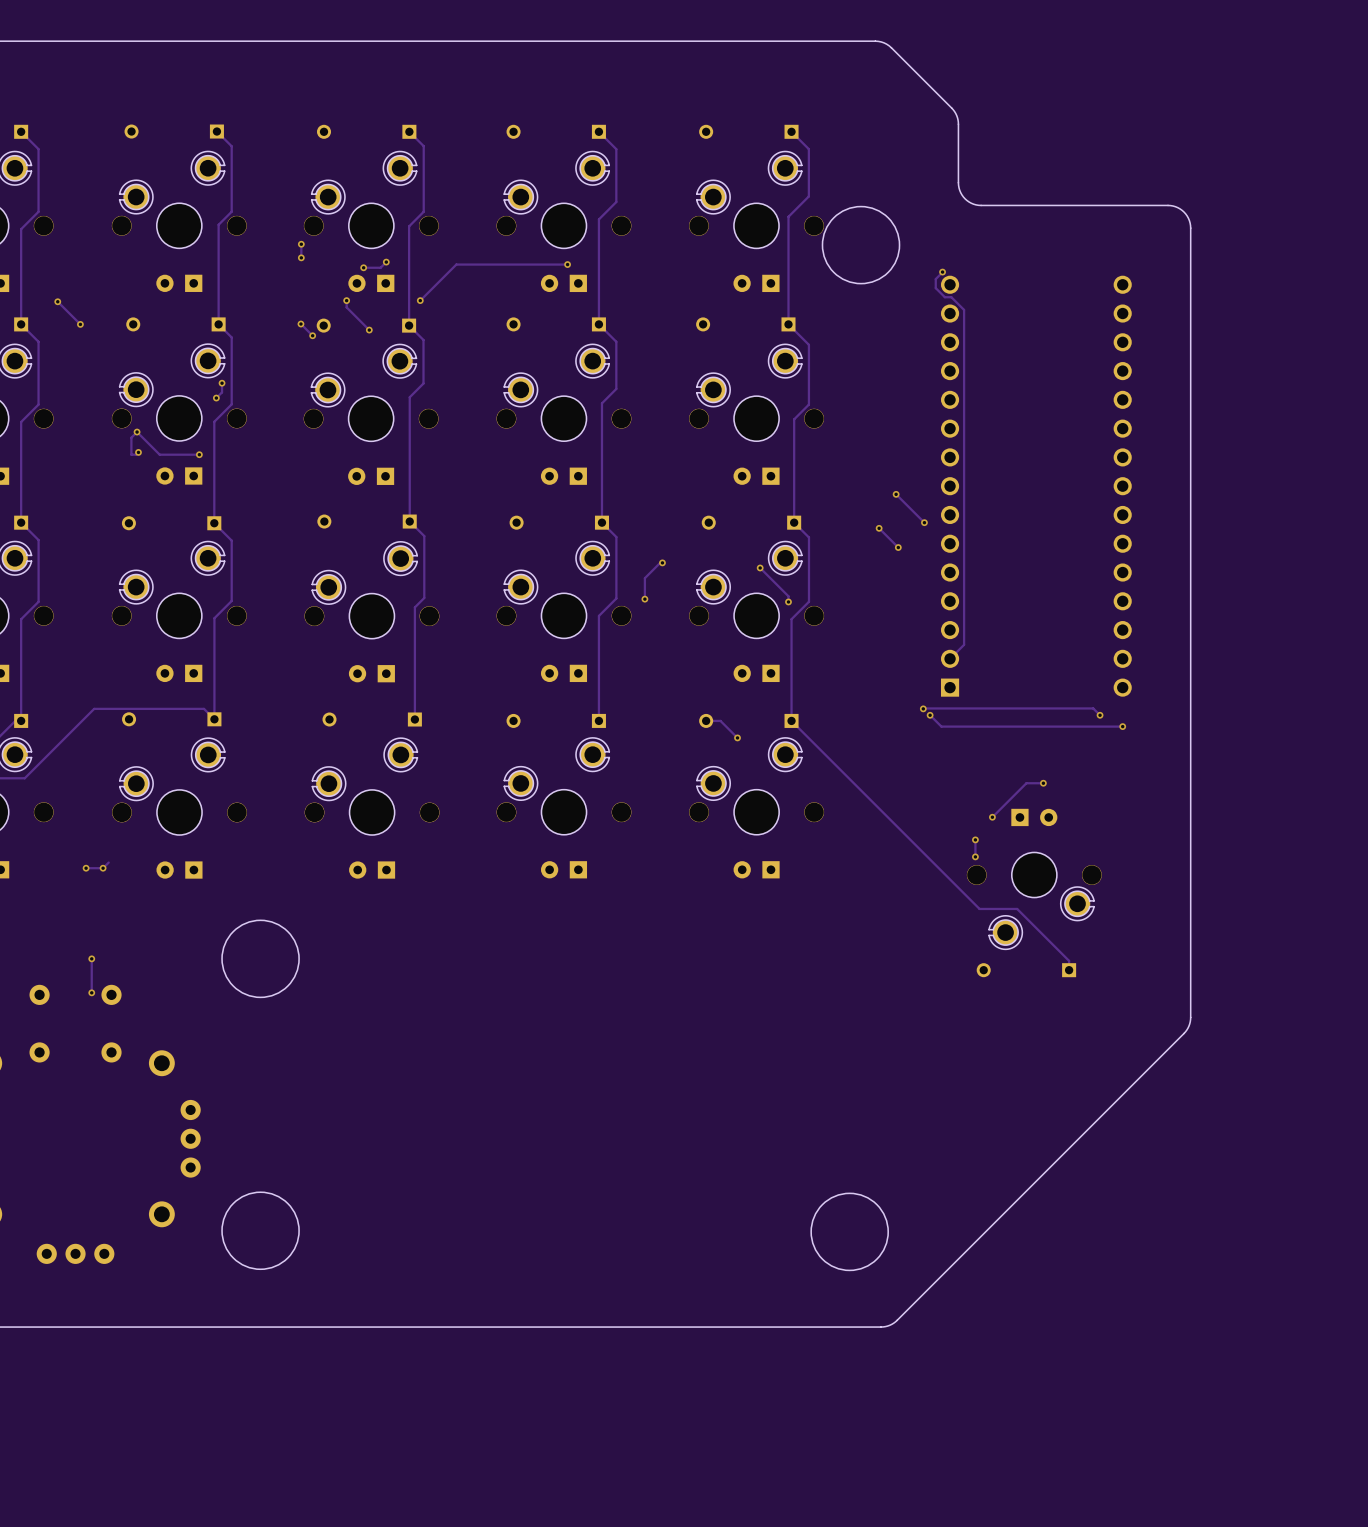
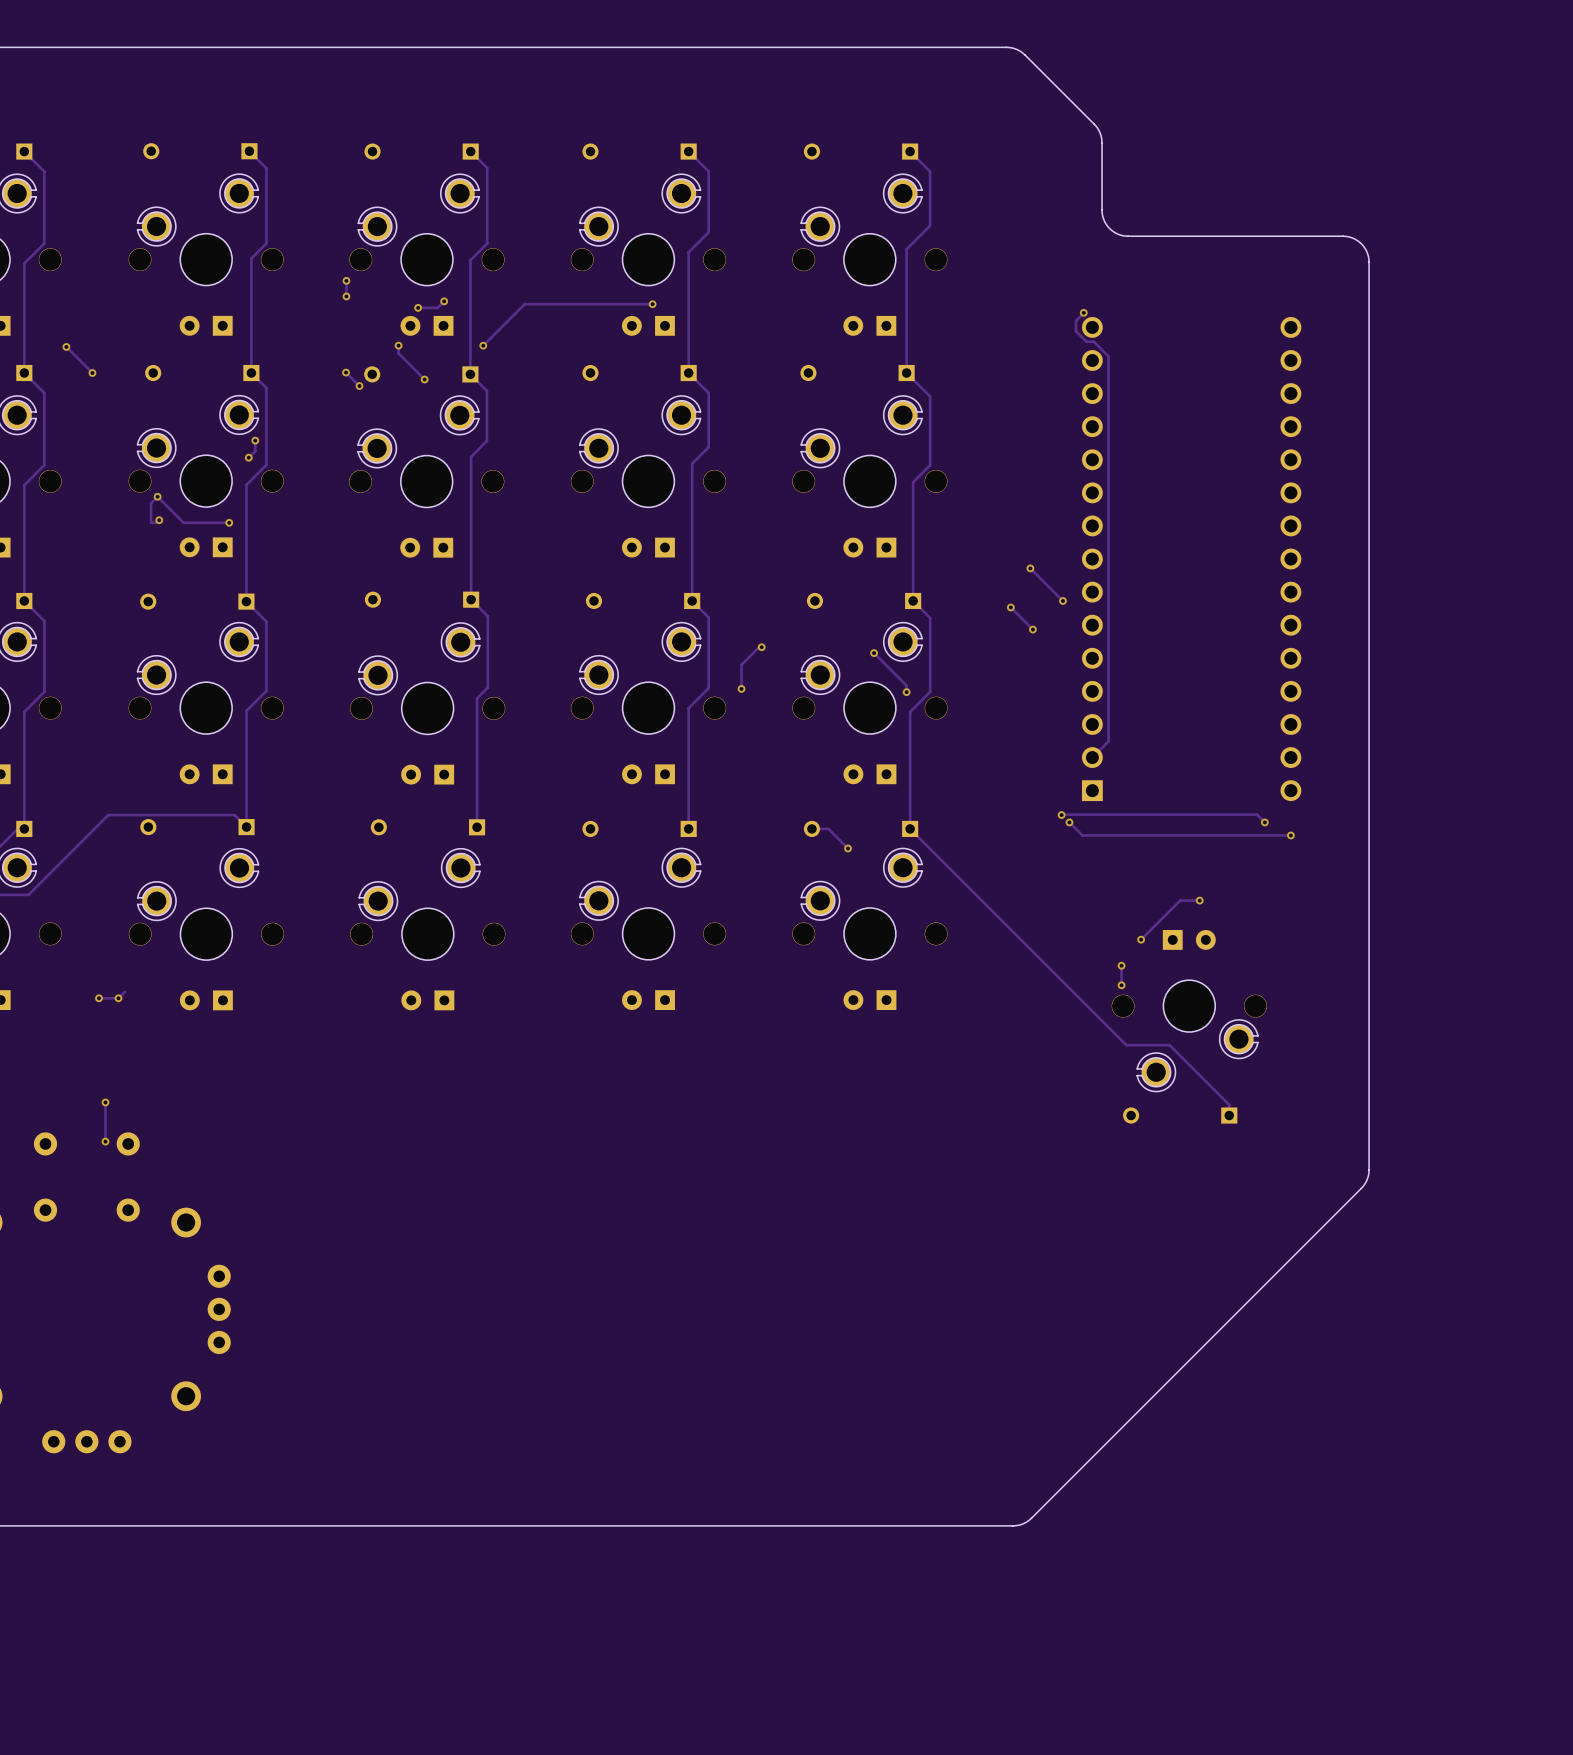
round board edge: [822, 206, 900, 284] -> none
round board edge: [221, 920, 300, 998] -> none
round board edge: [221, 1191, 300, 1270] -> none
round board edge: [810, 1193, 889, 1271] -> none

